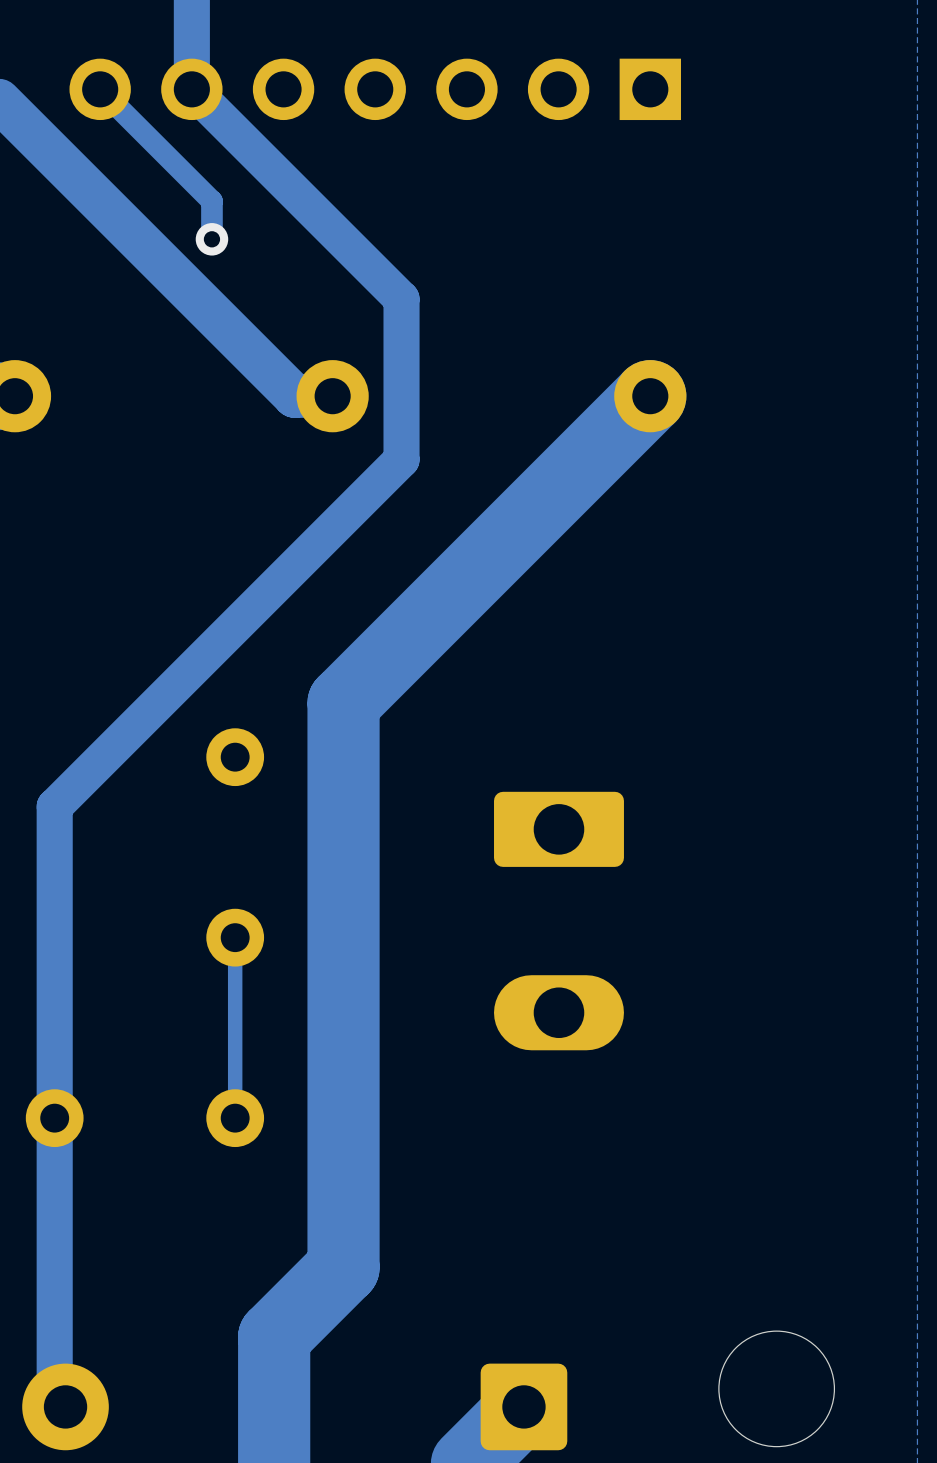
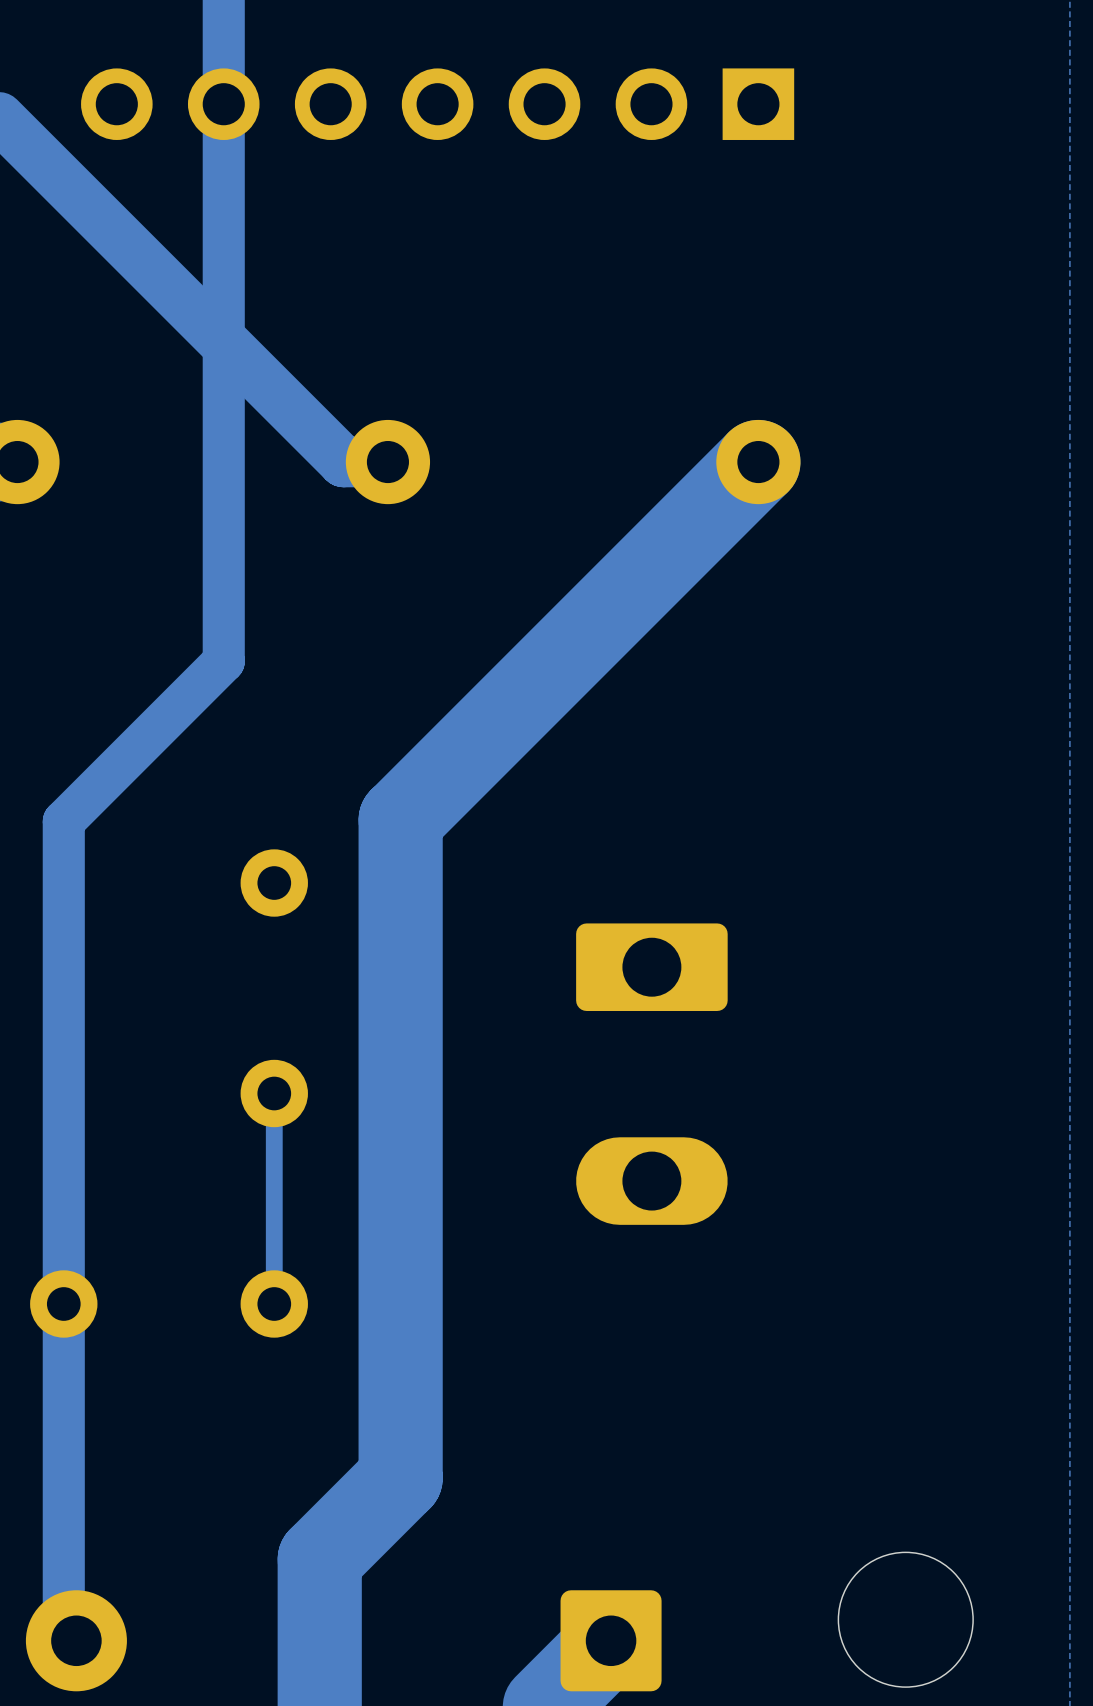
track: (100, 89) (211, 201) (211, 239) -> none
track: (191, 89) (401, 299) (401, 459) (54, 806) -> (223, 104) (223, 661) (63, 821) (63, 940)
via: (211, 239) -> none

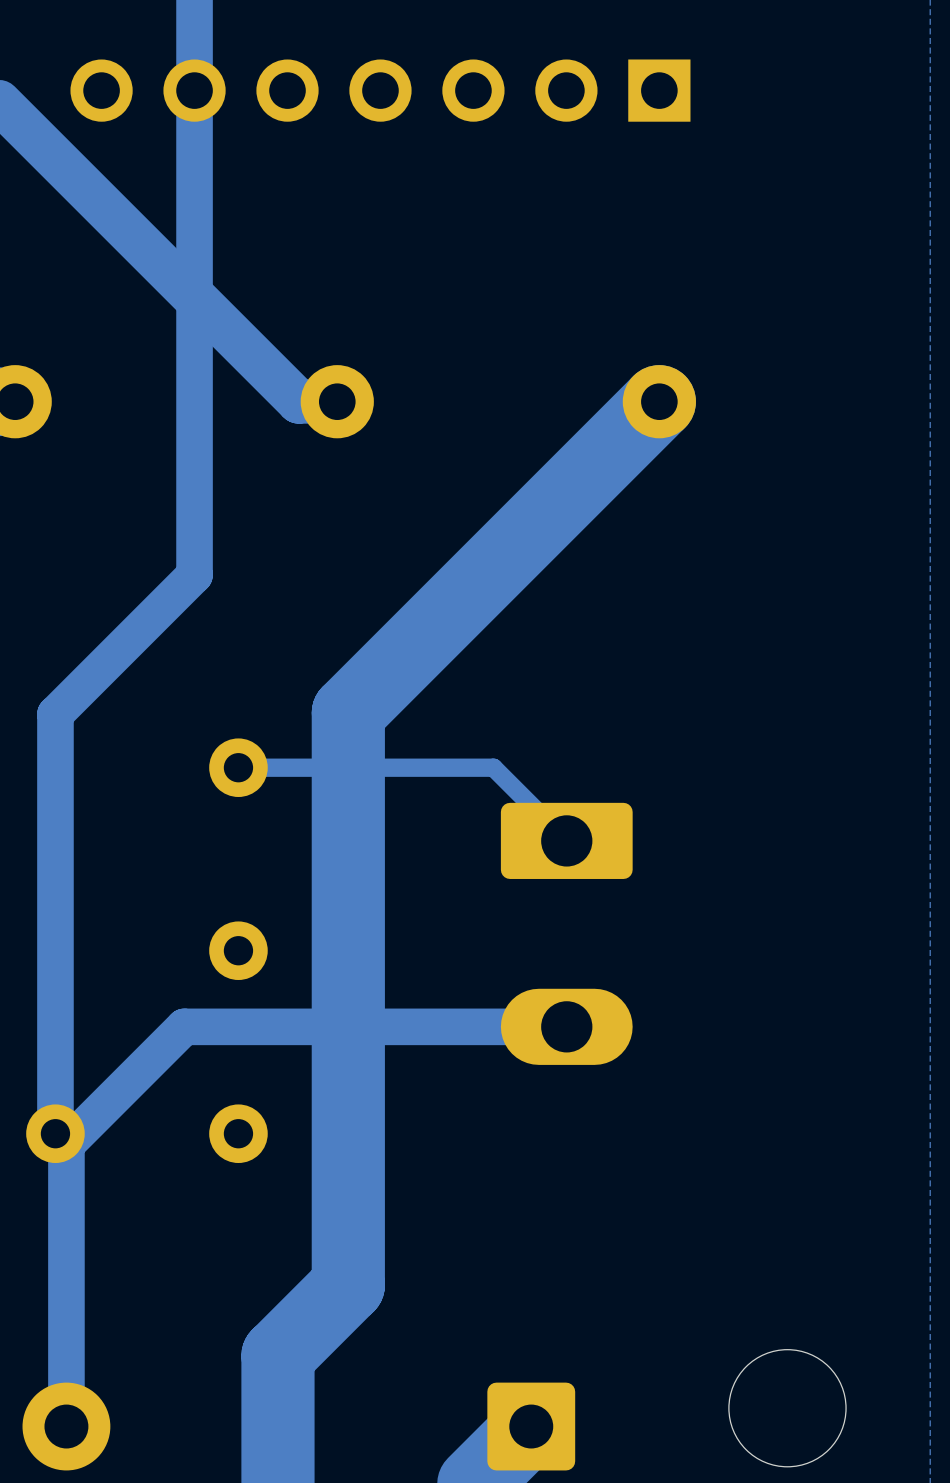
track: none -> (238, 767) (493, 767) (566, 840)
track: (274, 1093) (274, 1303) -> none
track: none -> (566, 1026) (184, 1026) (66, 1144)
track: (63, 1303) (63, 1628) (76, 1640) -> (66, 1144) (66, 1426)

